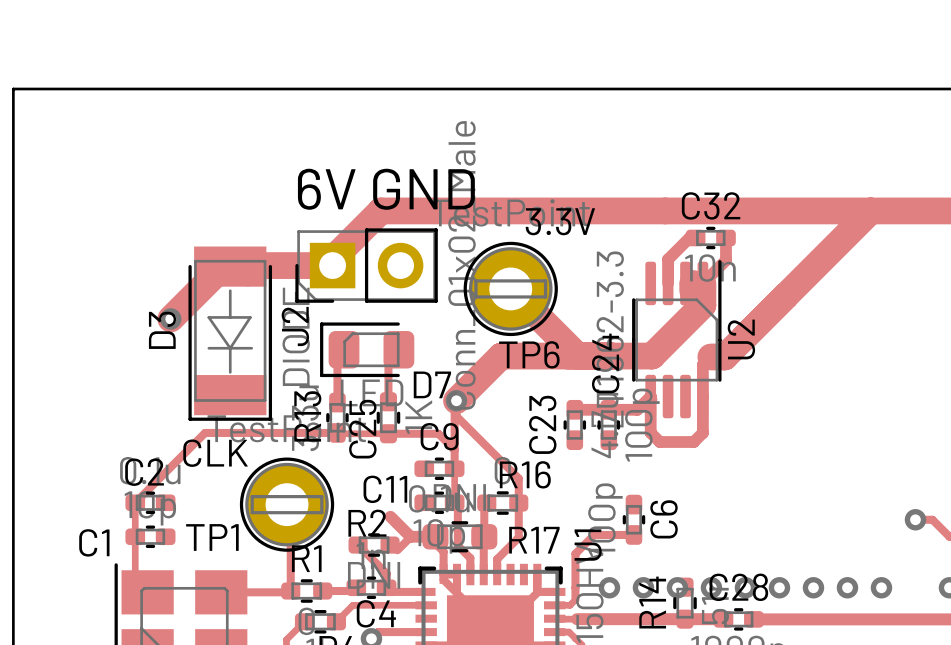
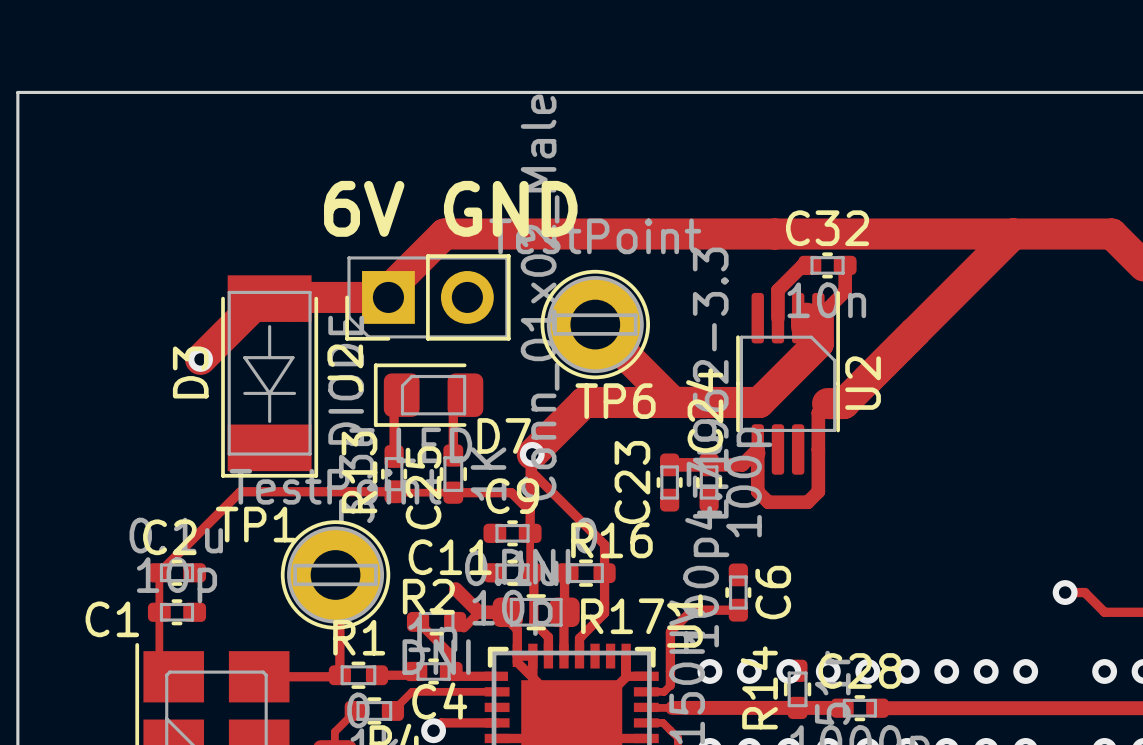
text: 3.3V (560, 221) -> none
text: CLK (215, 453) -> none
TP1 name position: TP1 (212, 537) -> TP1 (256, 524)

